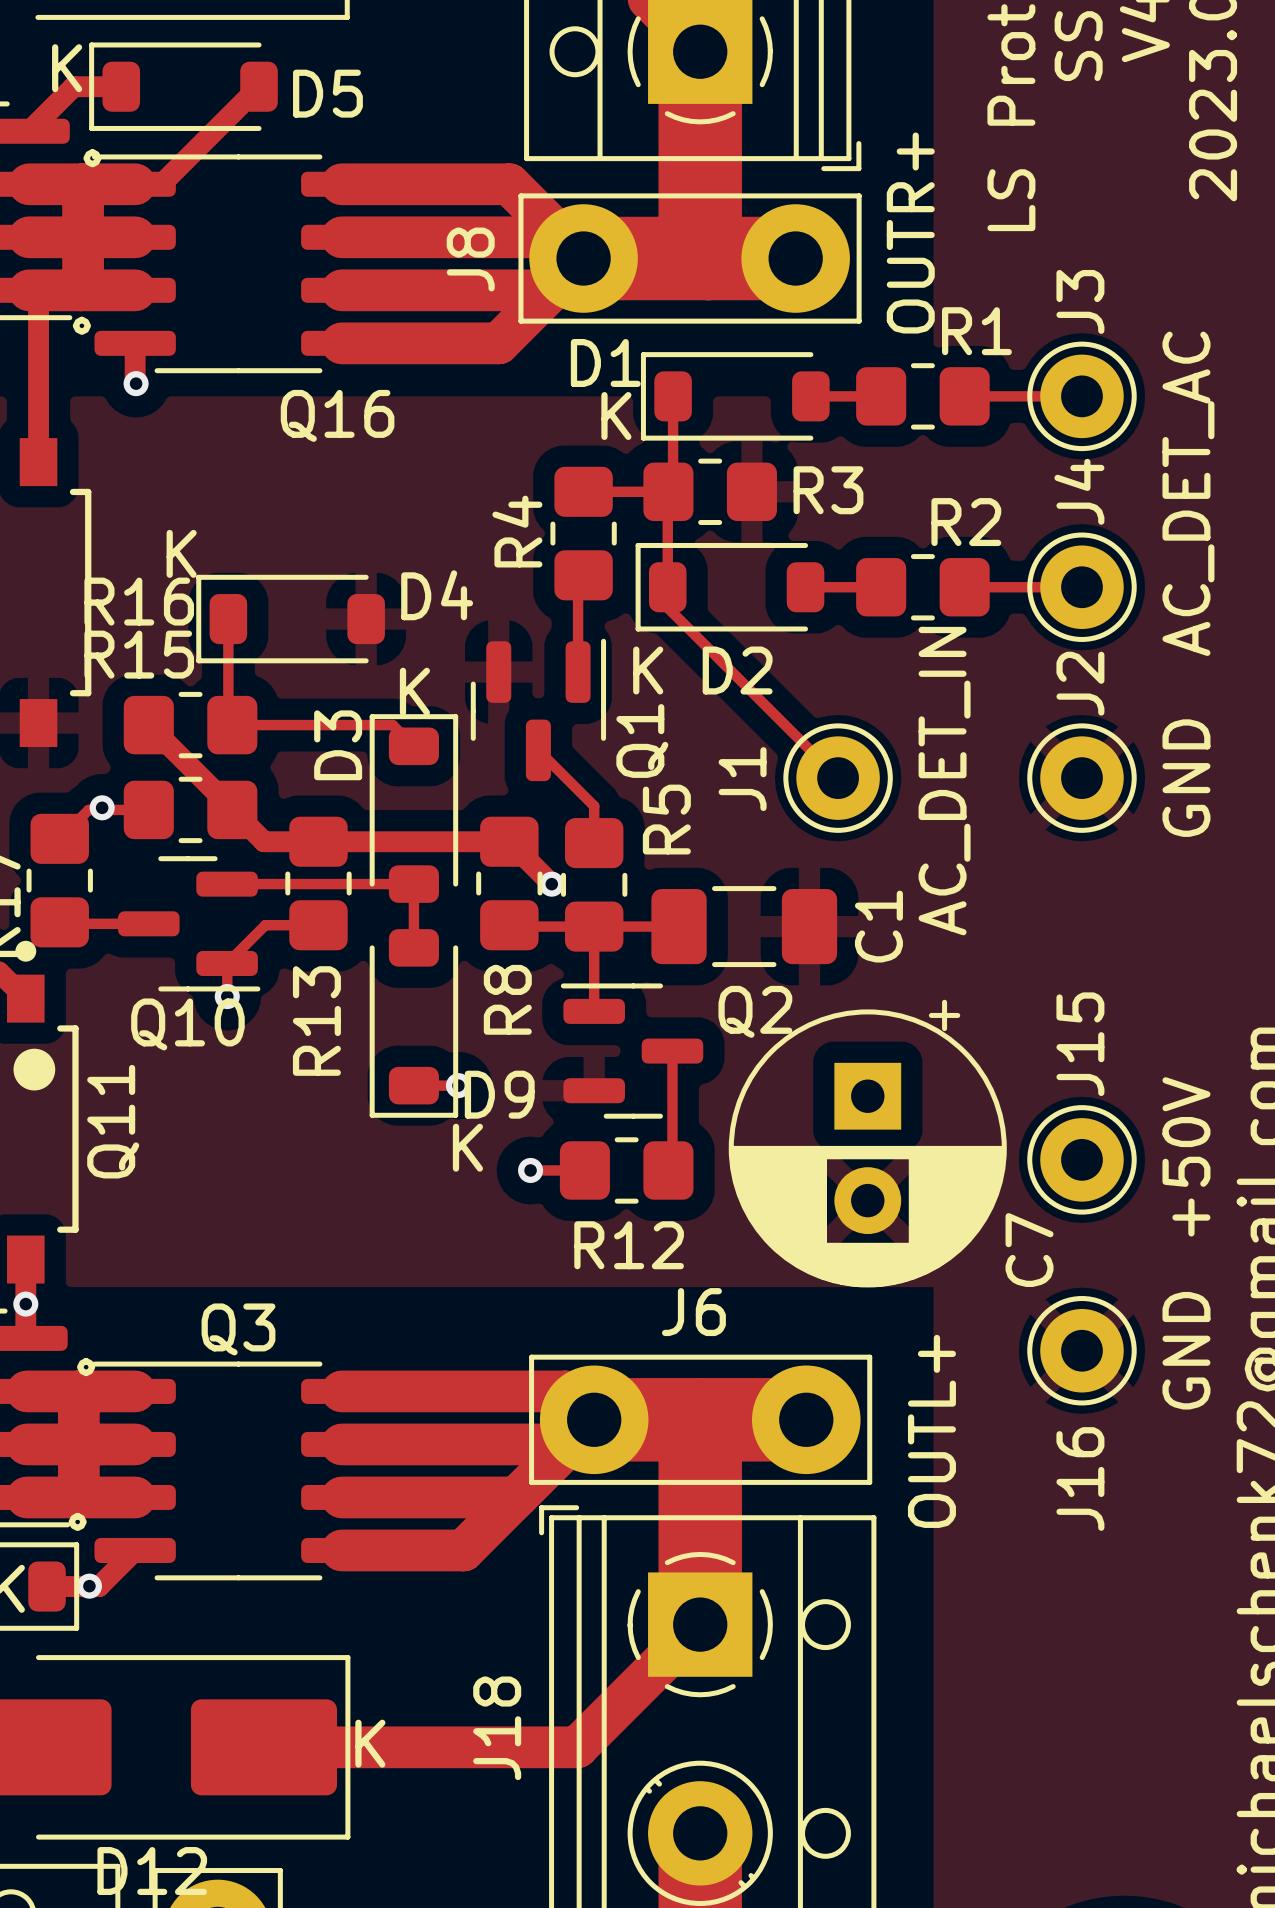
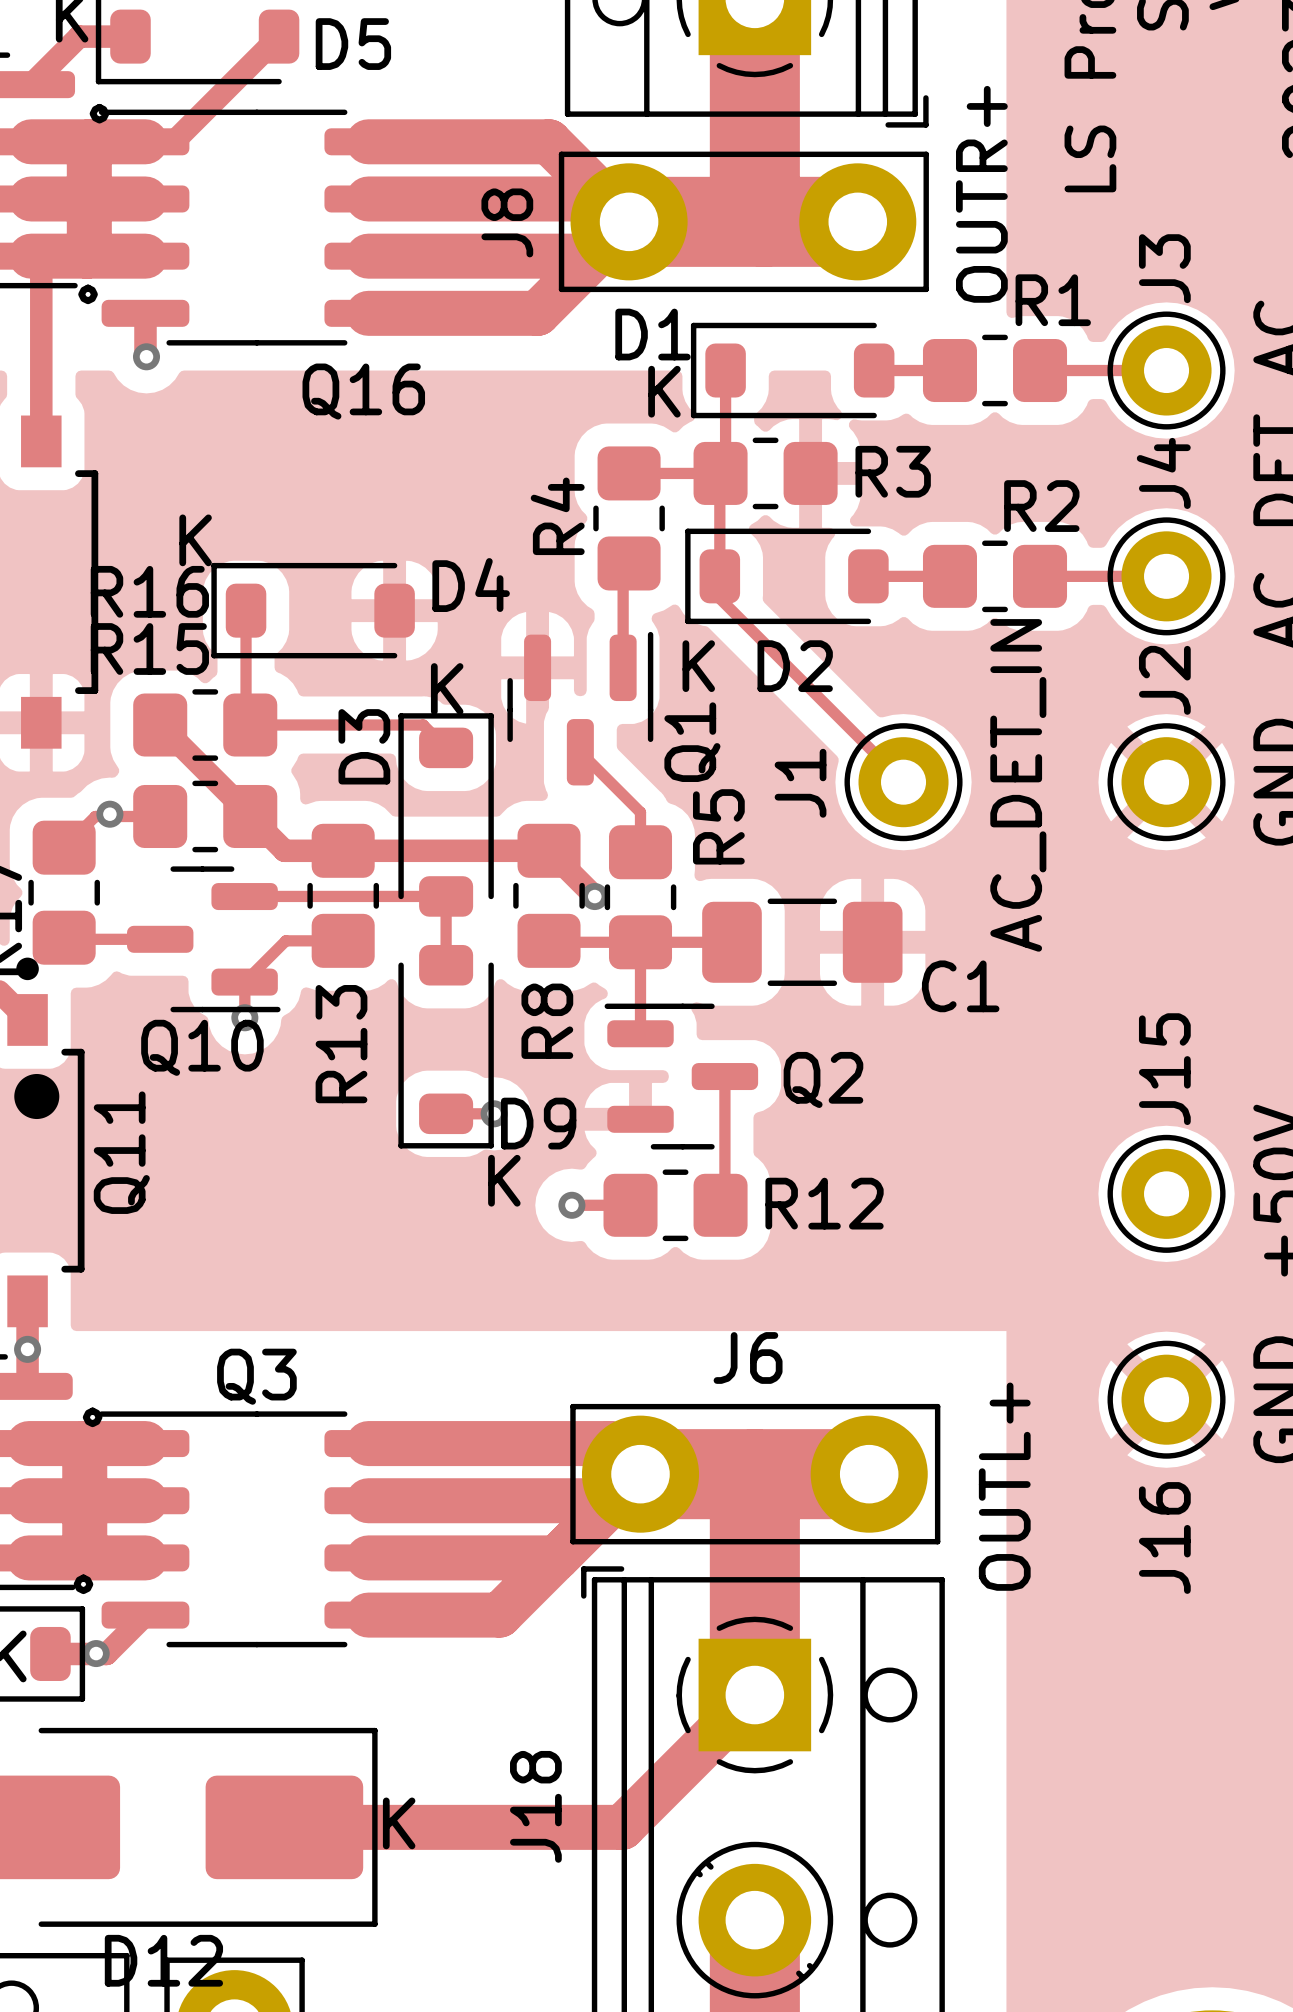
C1 name rotation: 0° (878, 926) -> 90° clockwise (960, 986)
Q2 name position: Q2 (755, 1011) -> Q2 (823, 1079)
C7: (867, 1143) -> none
R12 name position: R12 (629, 1245) -> R12 (824, 1203)

